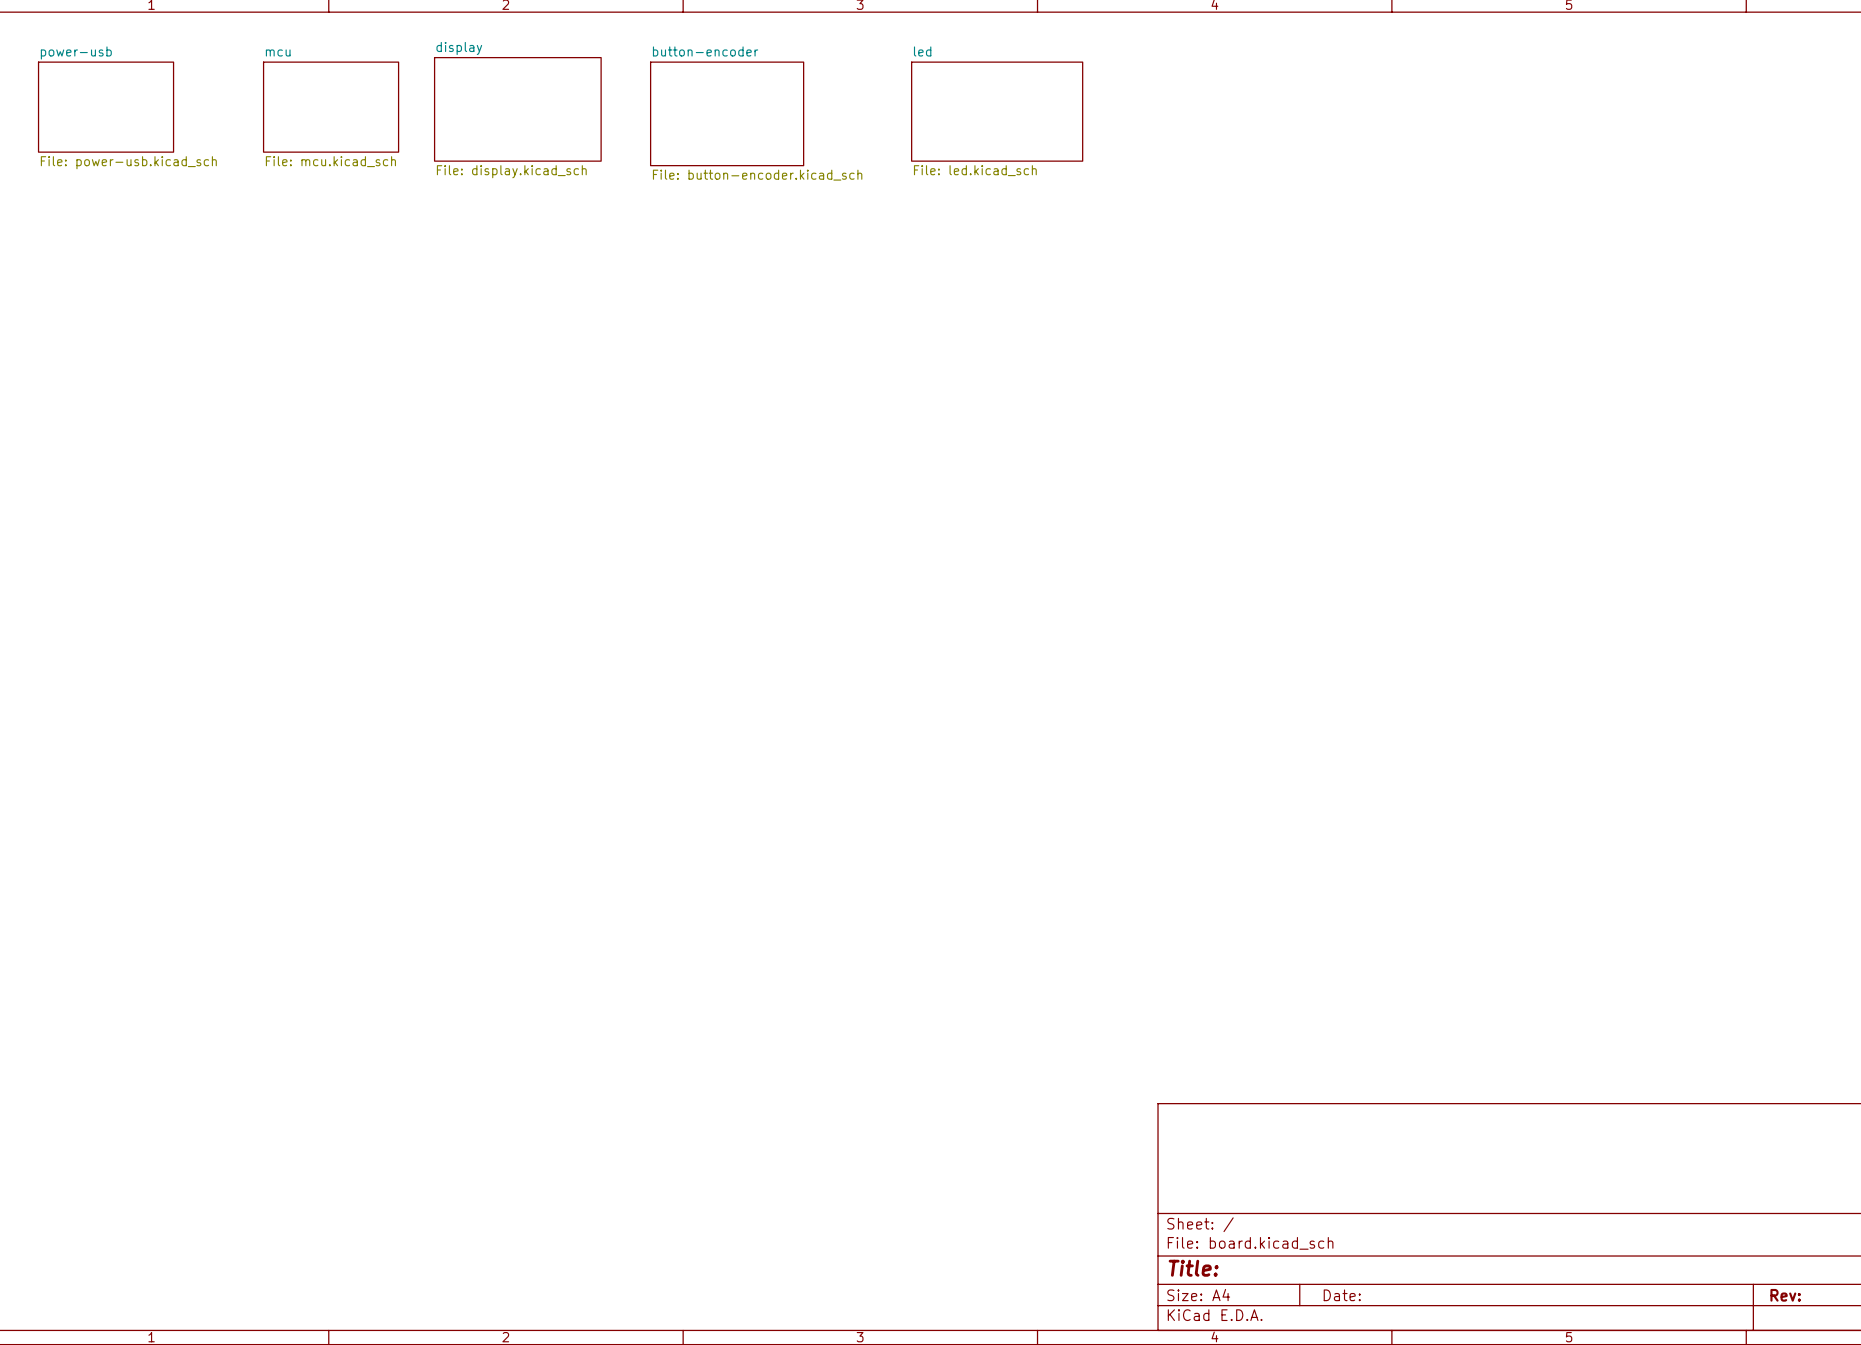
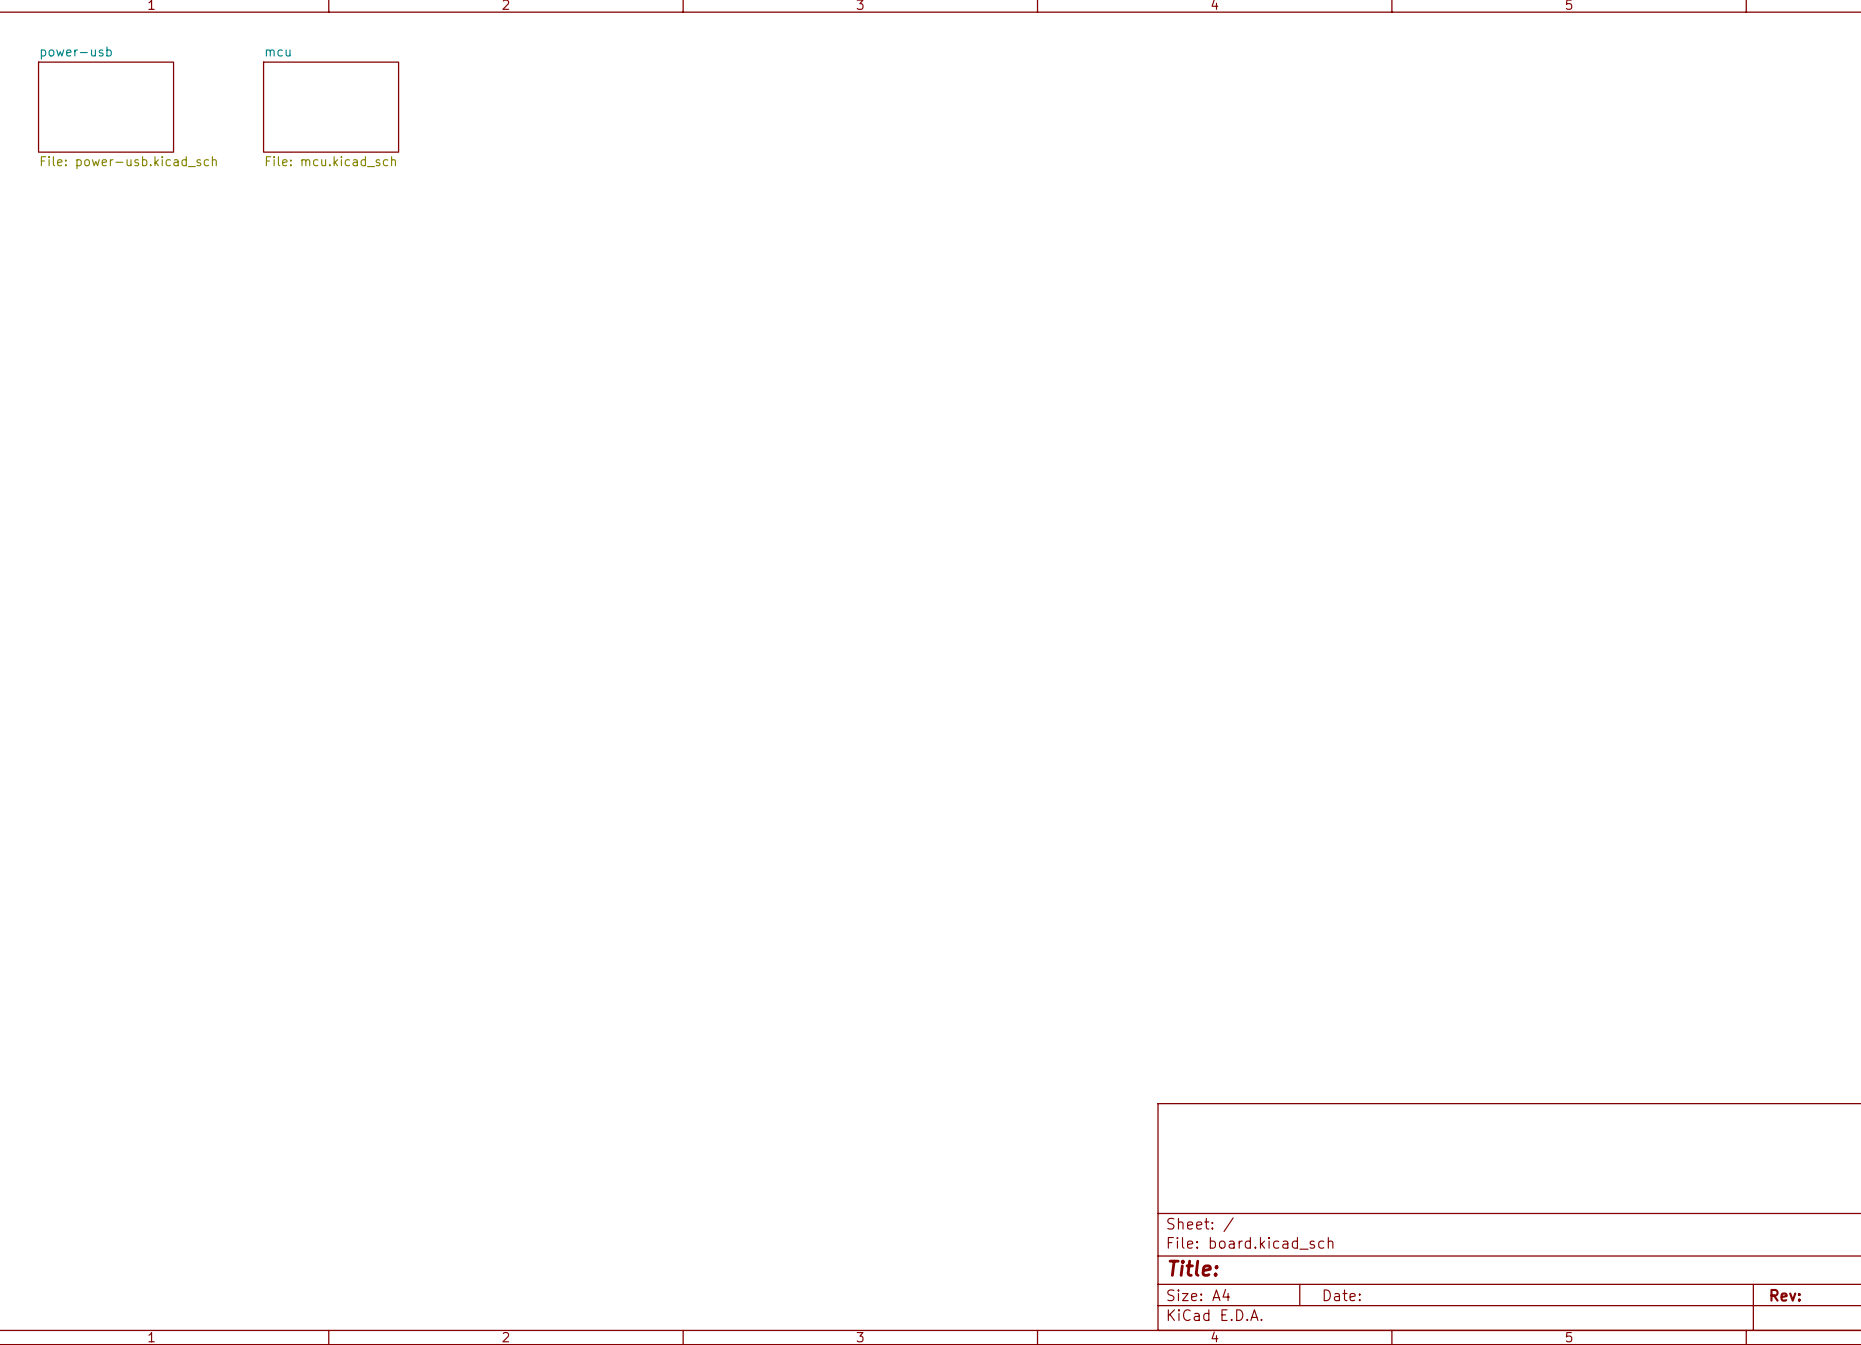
sheet display: File: display.kicad_sch (517, 109) -> none
sheet led: File: led.kicad_sch (997, 111) -> none
sheet button-encoder: File: button-encoder.kicad_sch (727, 113) -> none

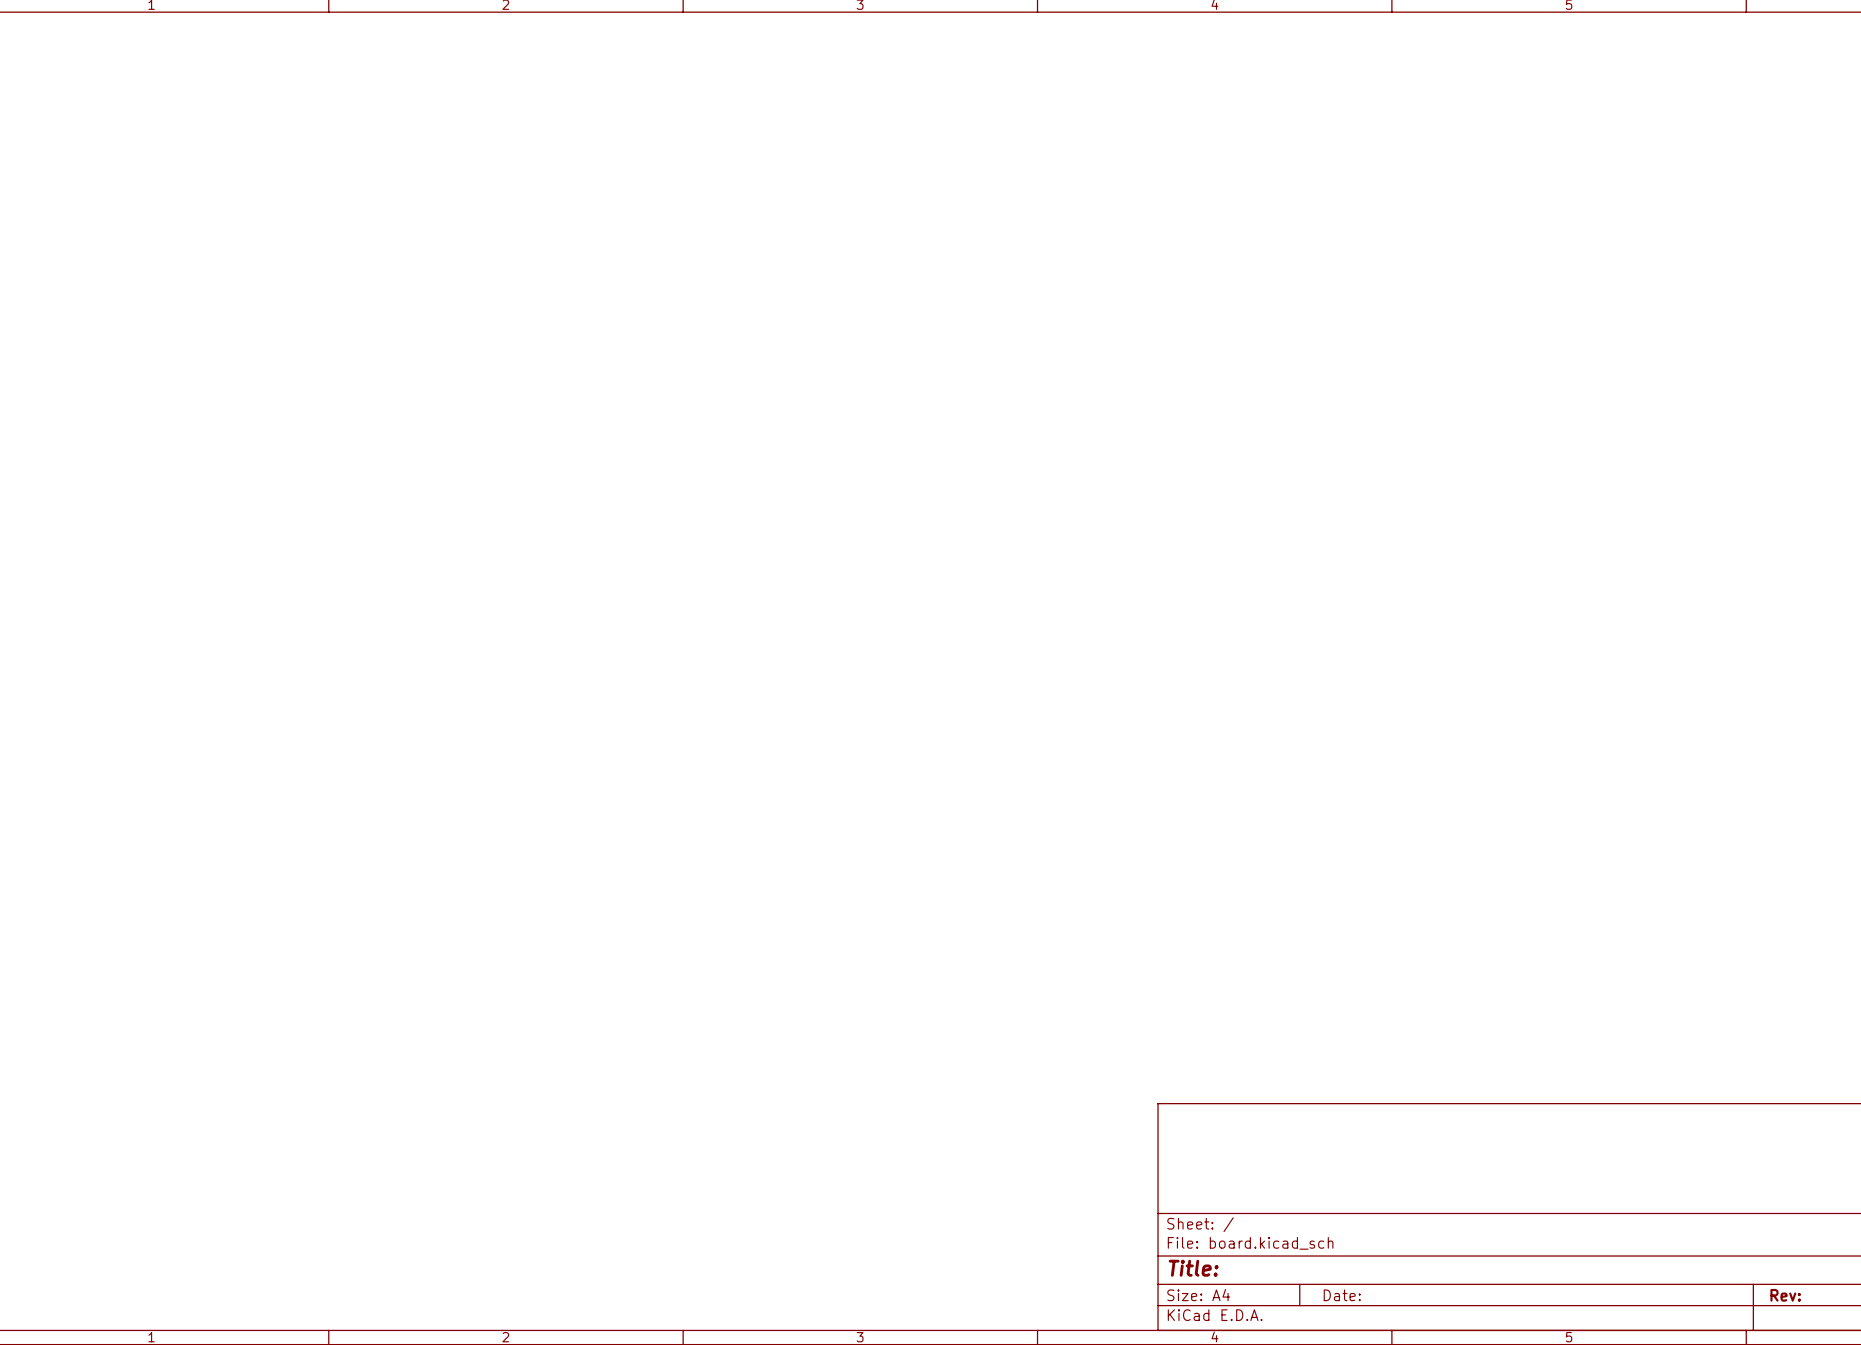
sheet power-usb: File: power-usb.kicad_sch (106, 107) -> none
sheet mcu: File: mcu.kicad_sch (331, 107) -> none

